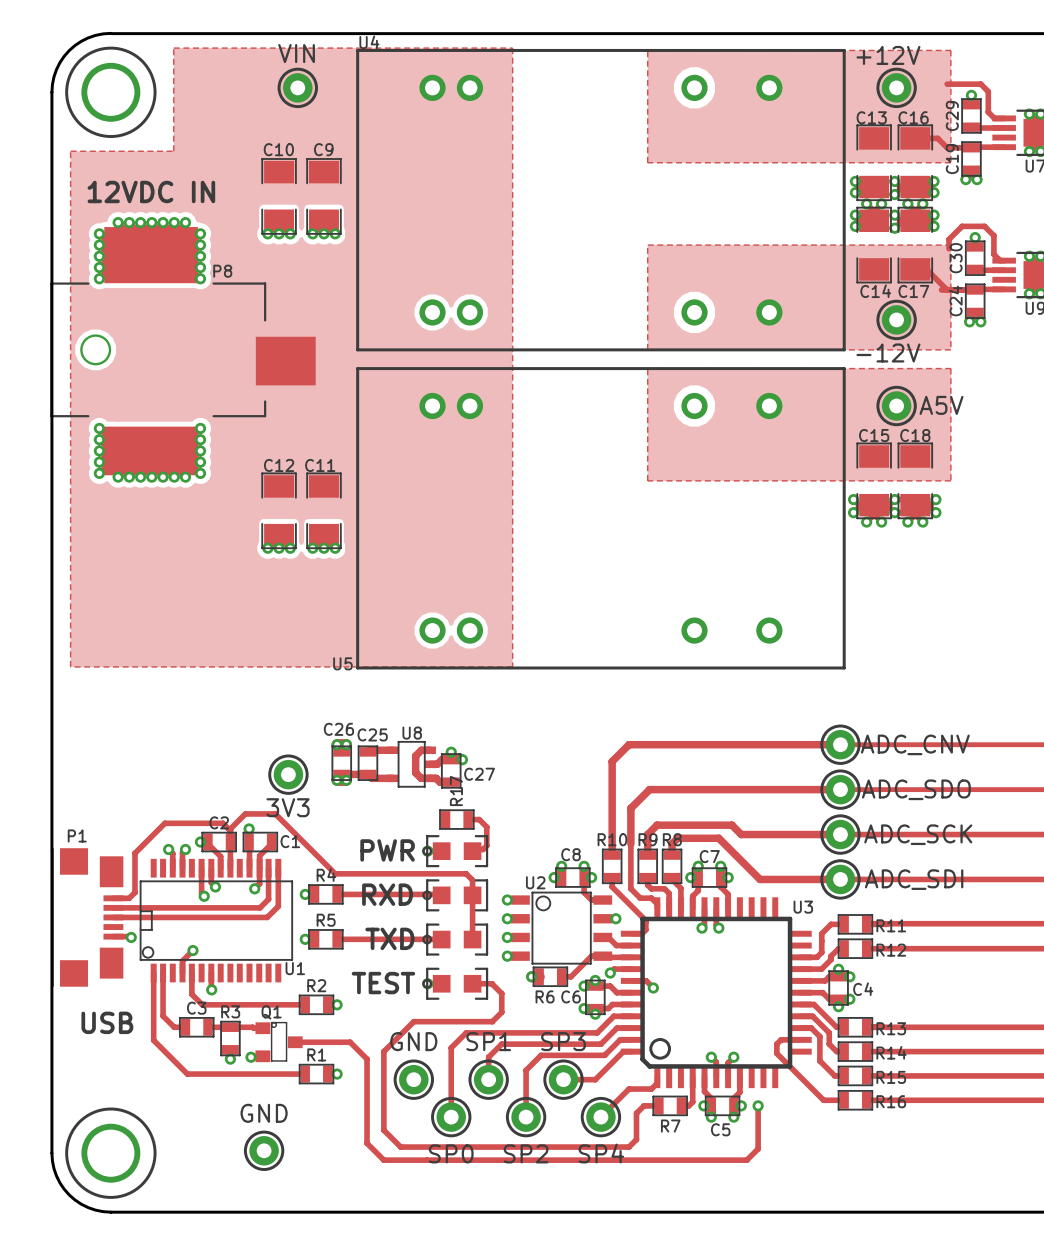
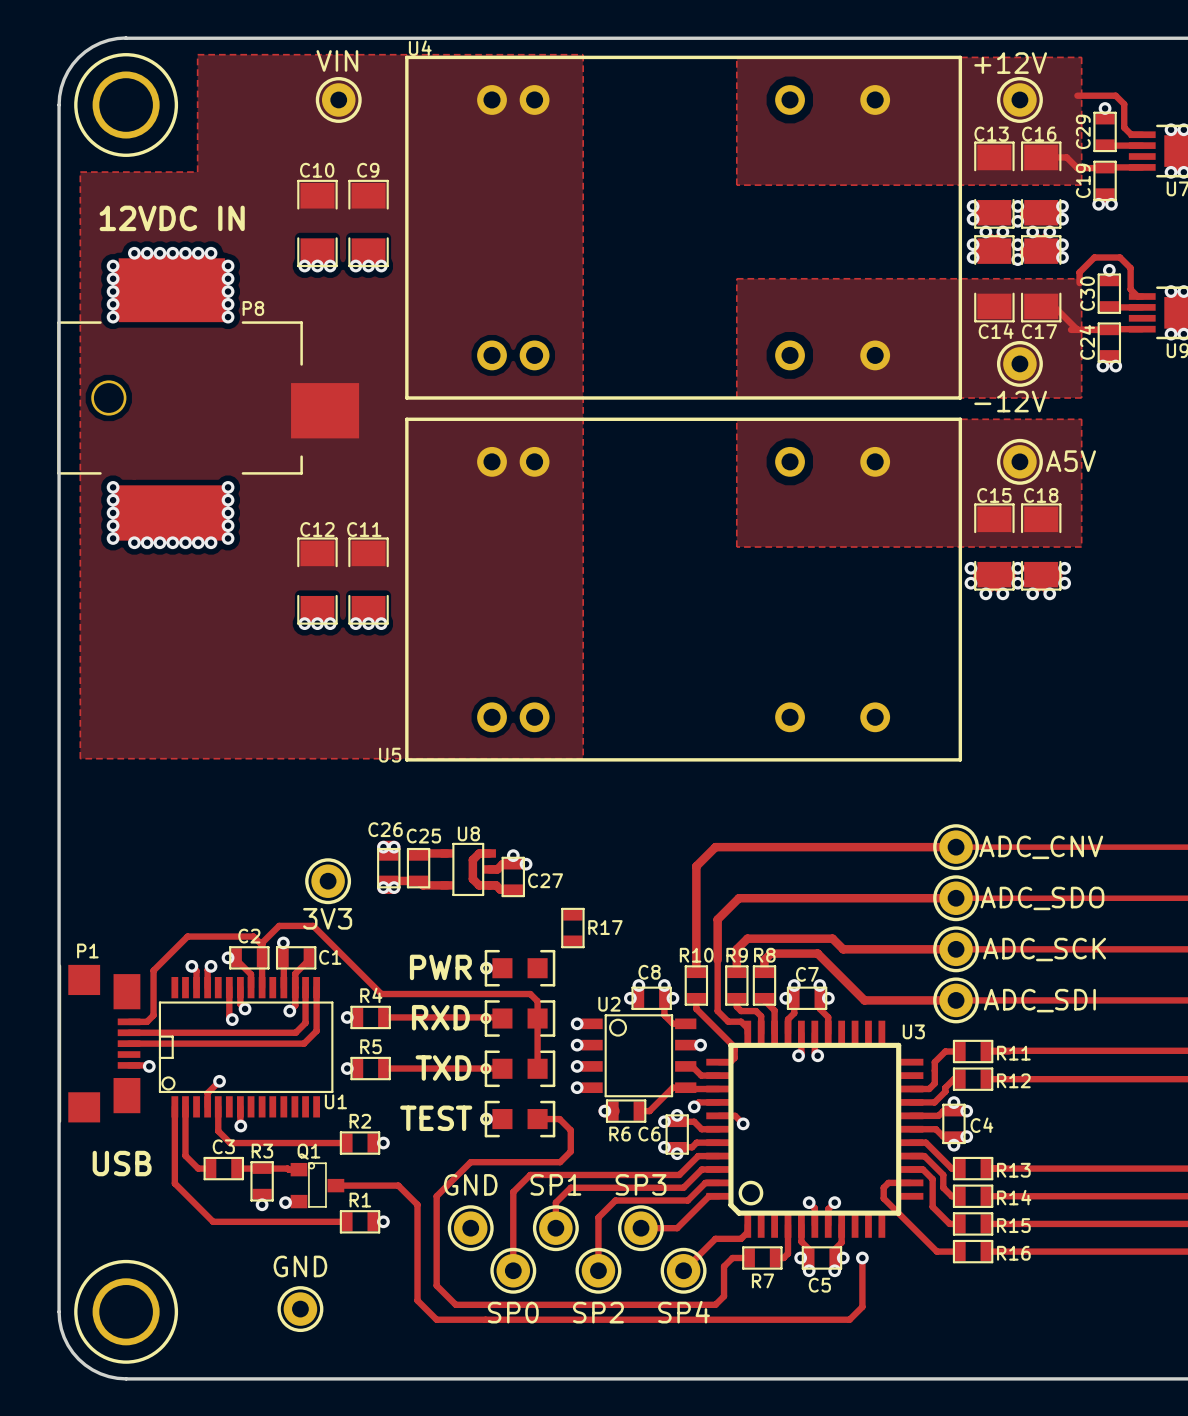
R17 rotation: 0° (456, 819) -> 90° clockwise (572, 928)
R17 position: (456, 819) -> (572, 928)
track: (468, 819) (479, 819) (486, 827) (486, 845) (483, 849) (472, 851) -> none

